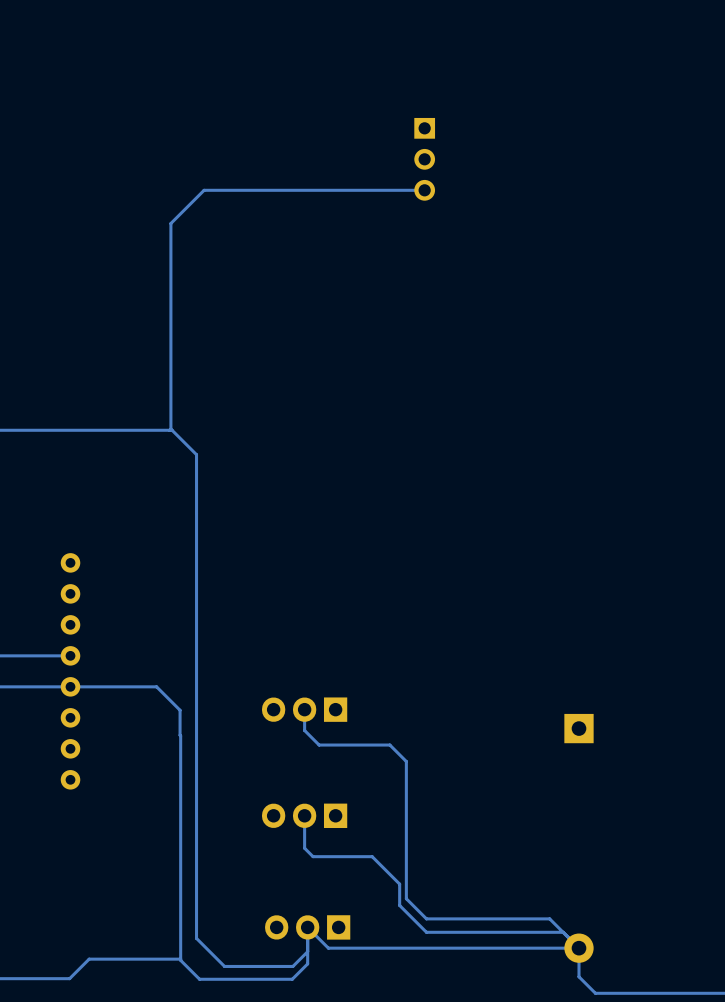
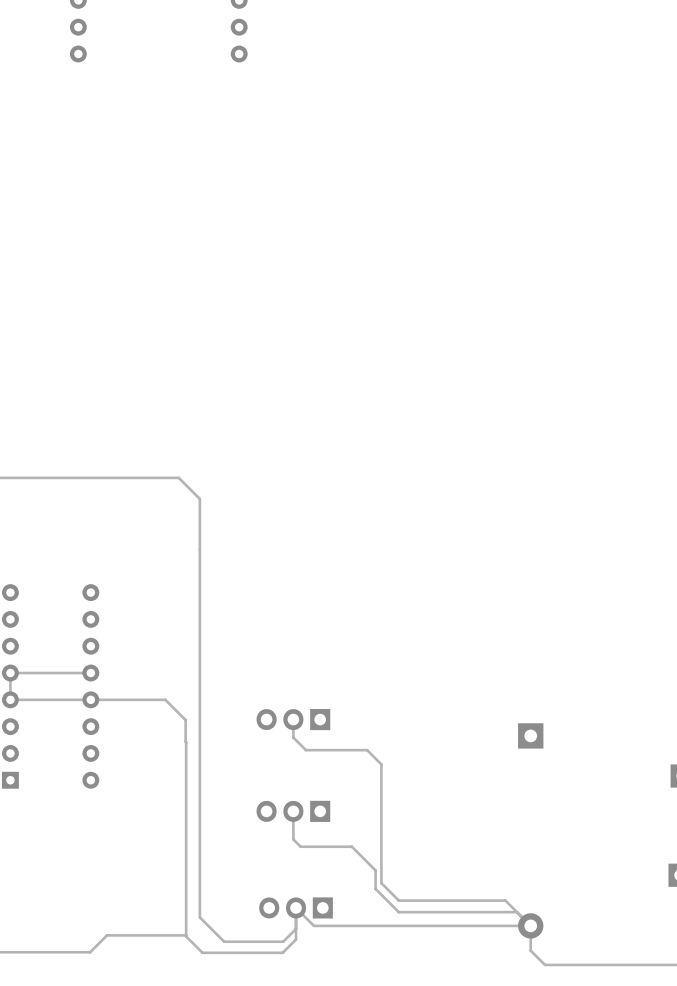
part: (424, 159) -> none
track: (424, 190) (204, 190) (170, 223) (169, 430) -> none

